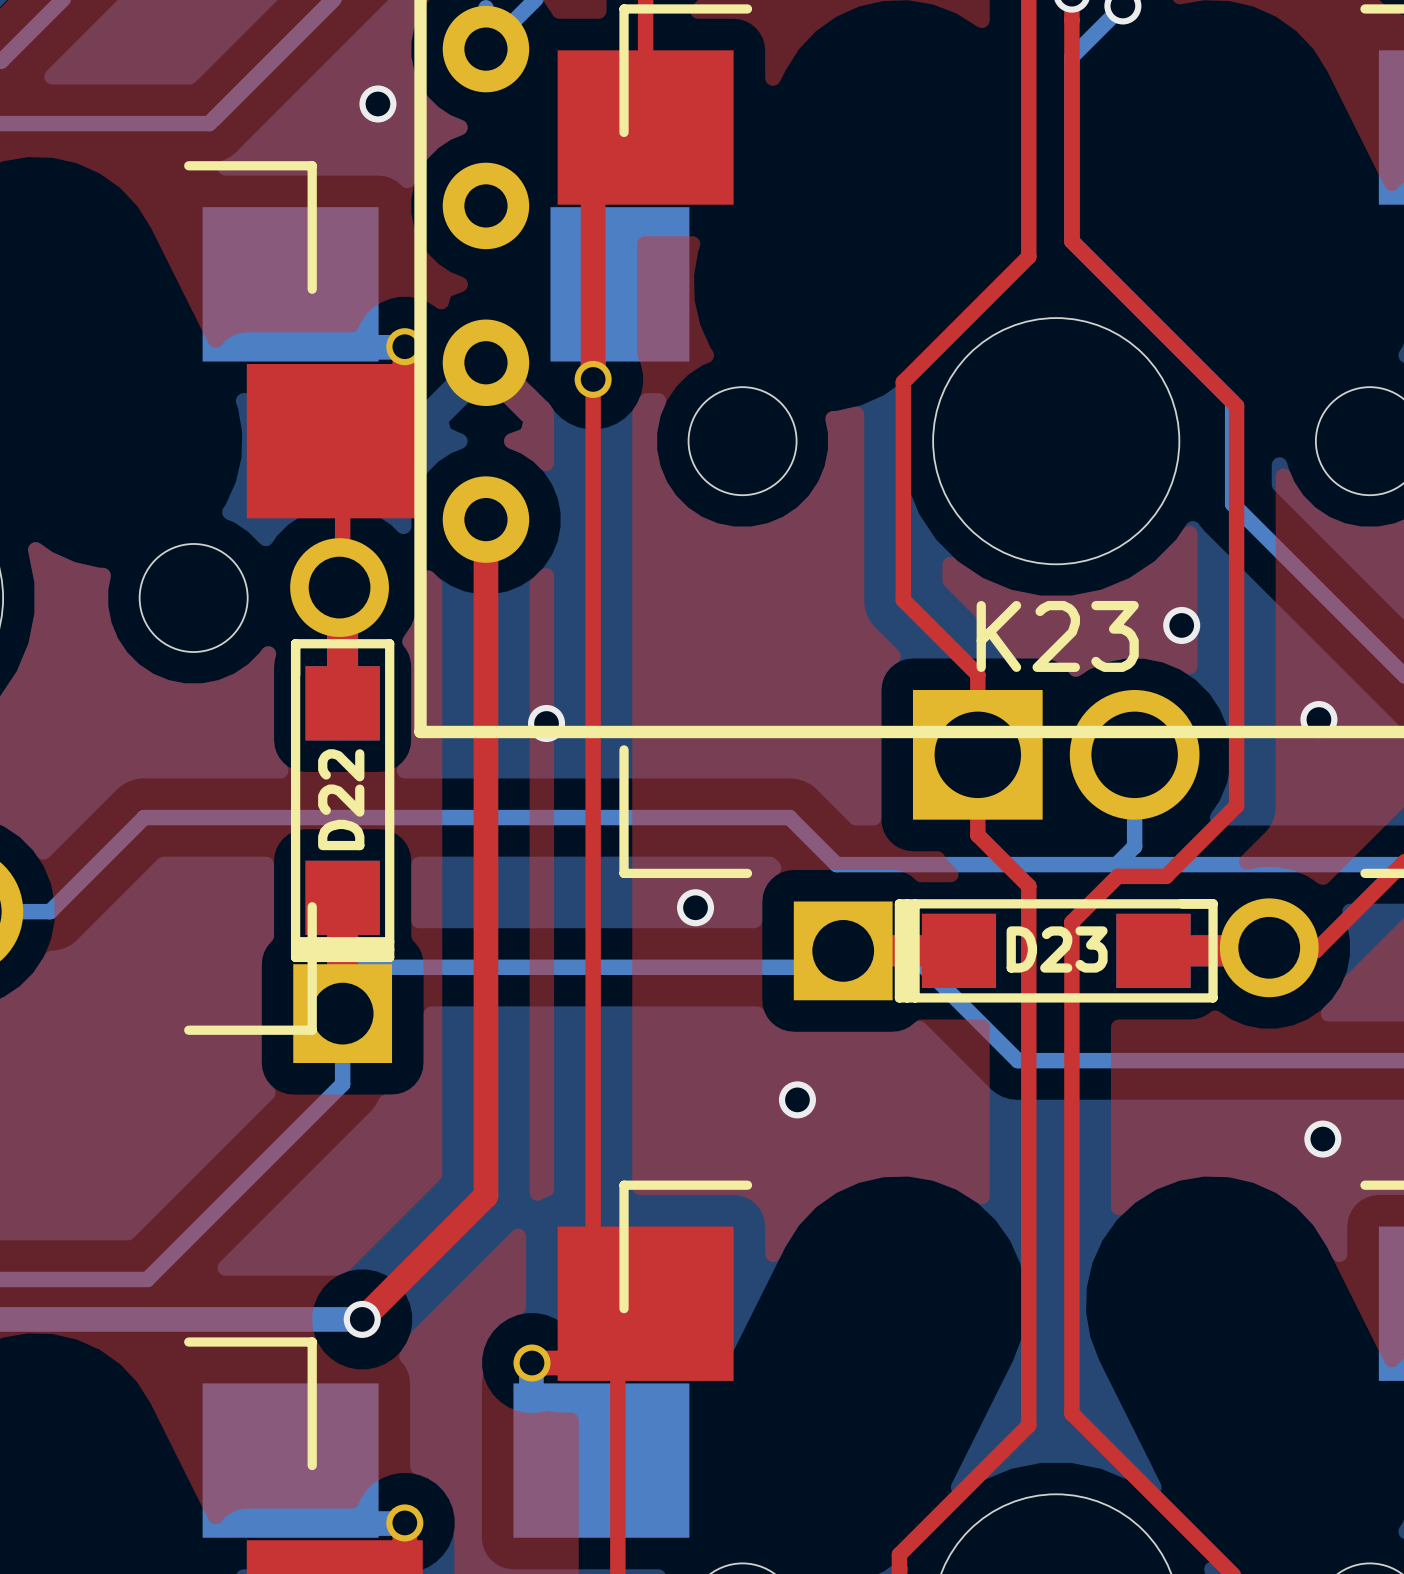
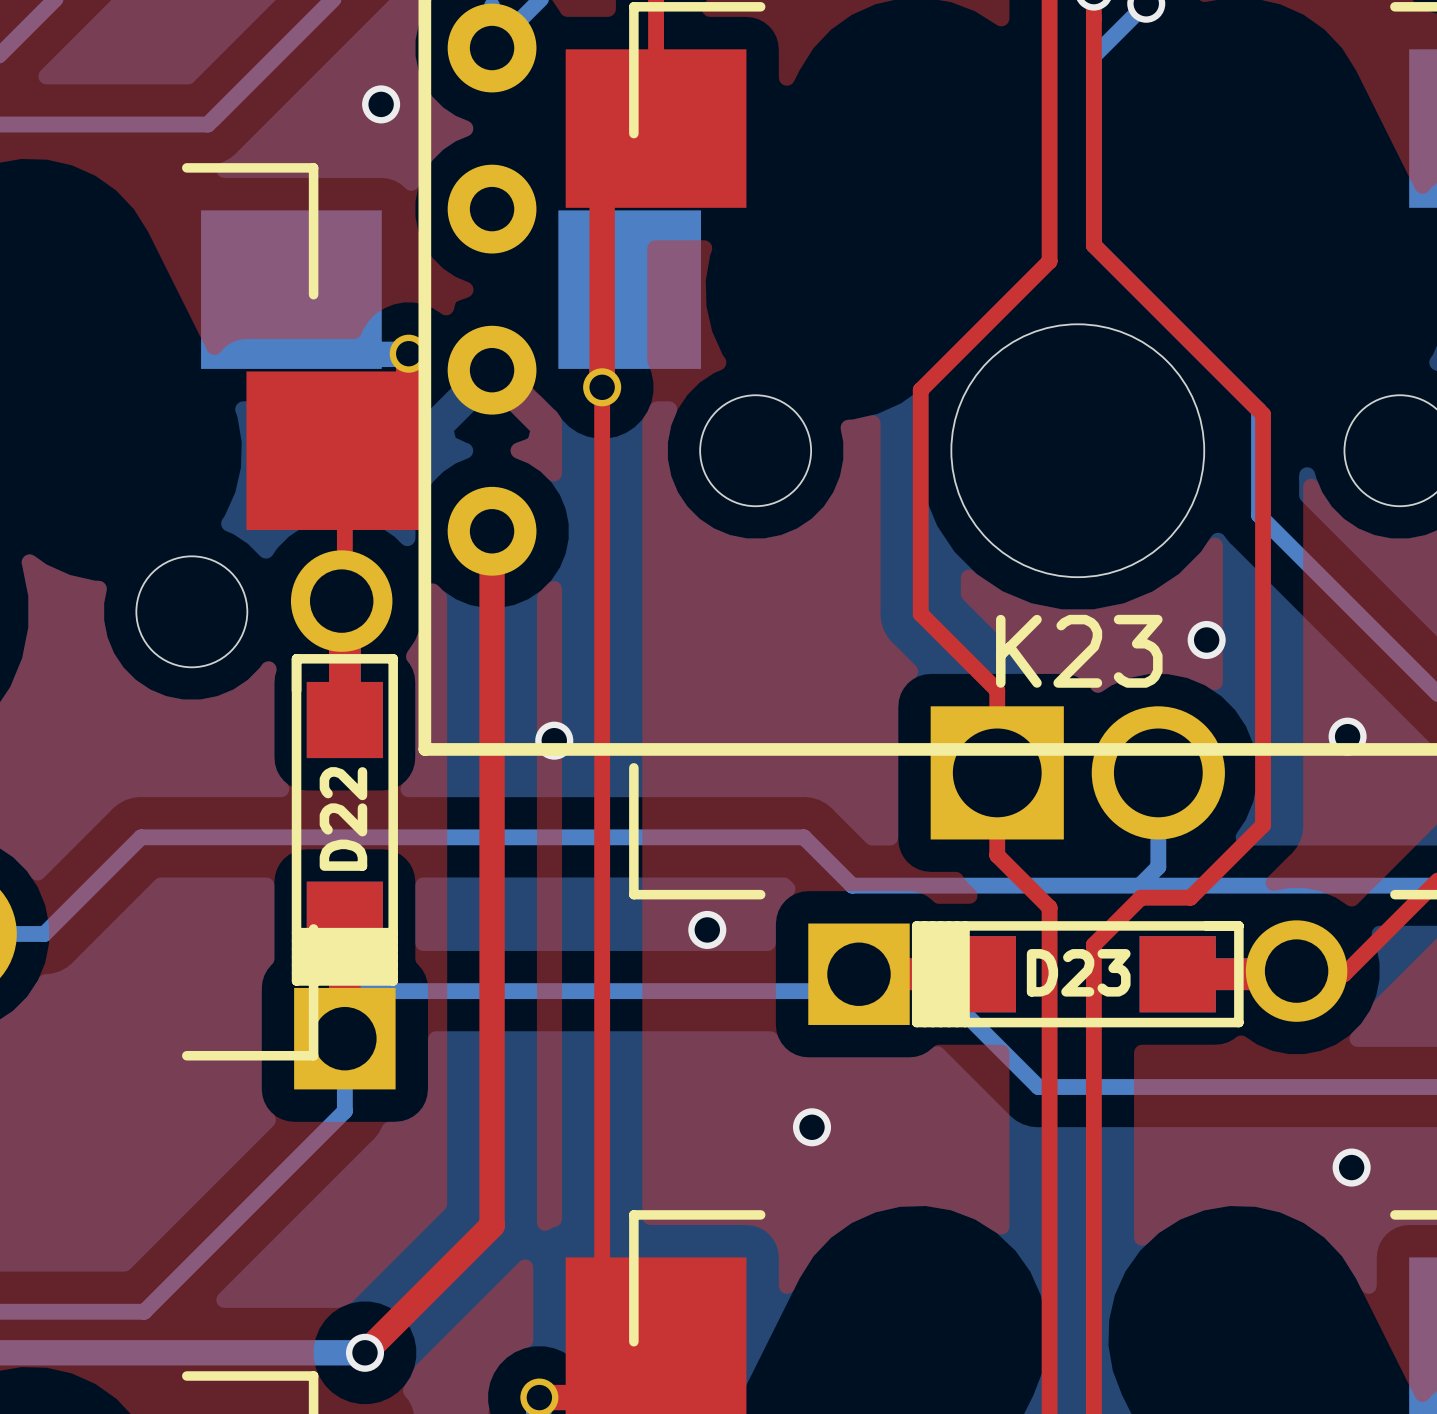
D22 footprint: [290, 538, 395, 1064] -> [290, 550, 398, 1090]
D23 footprint: [793, 898, 1319, 1003] -> [808, 920, 1348, 1028]

